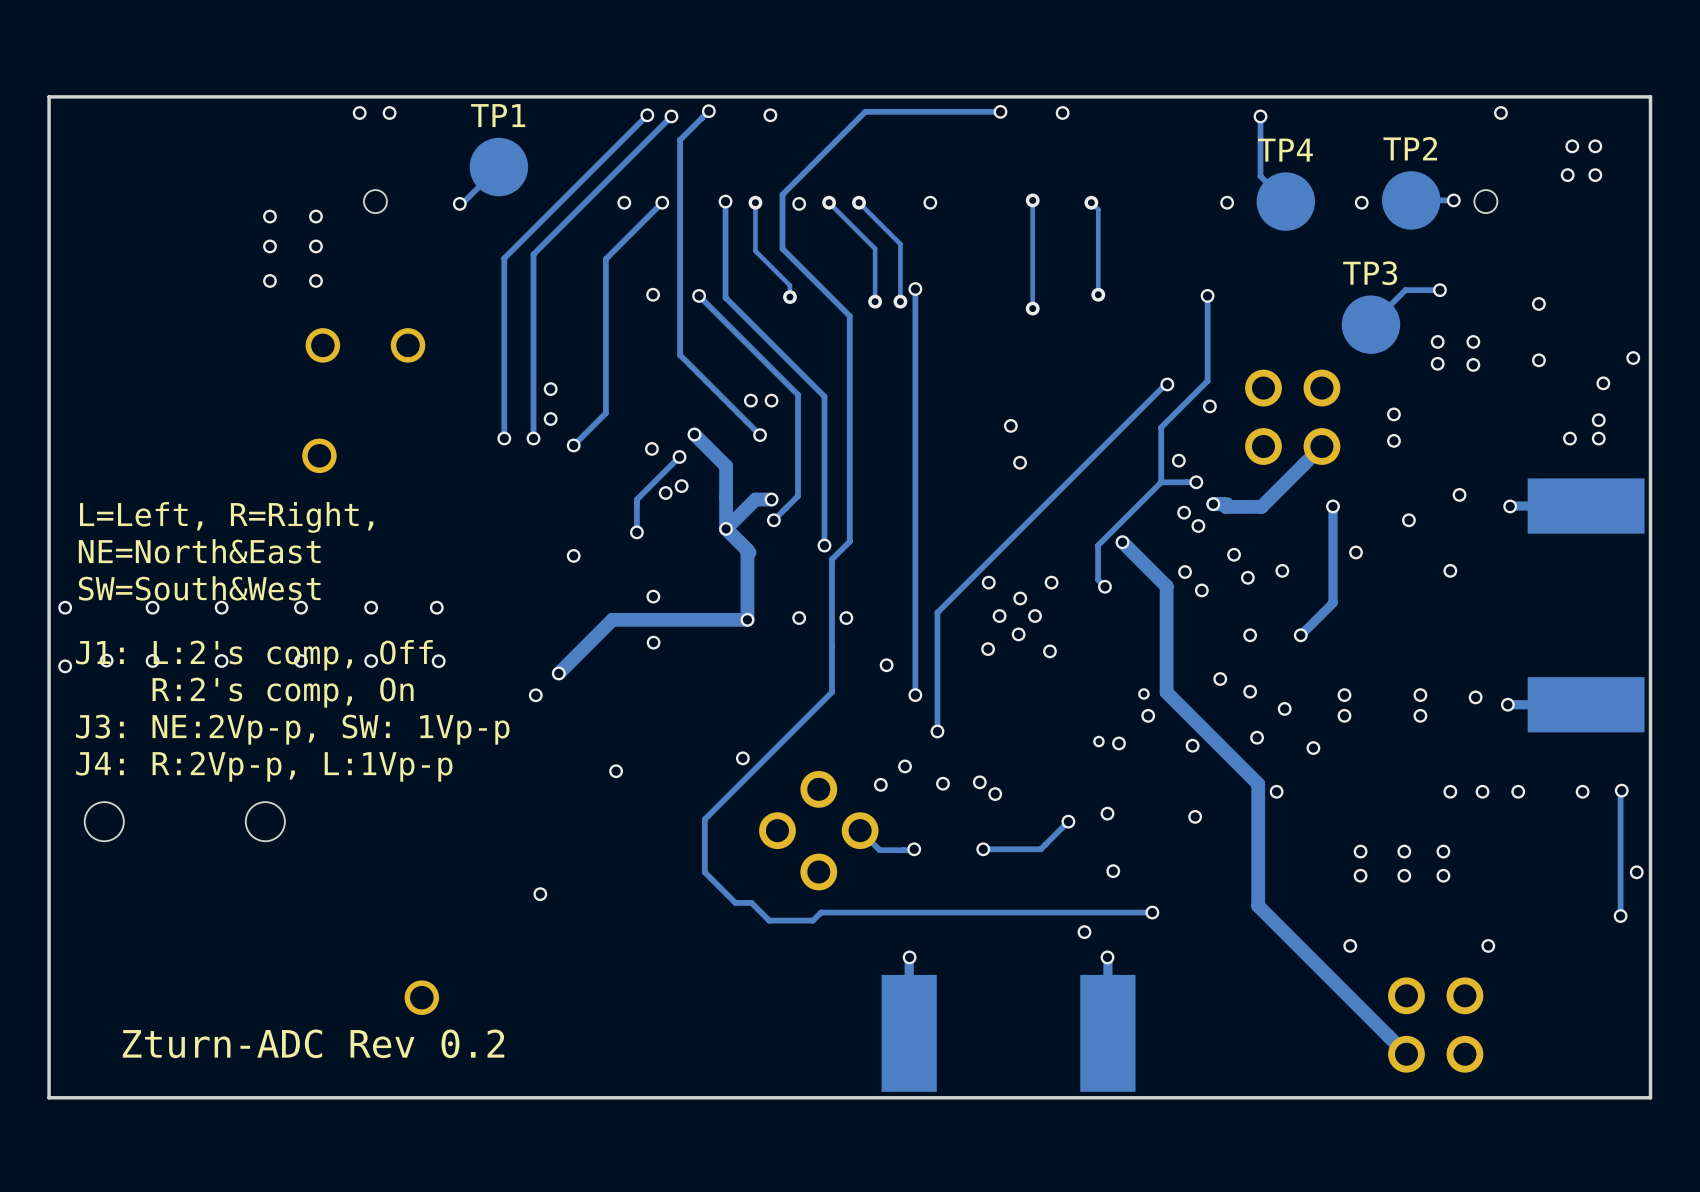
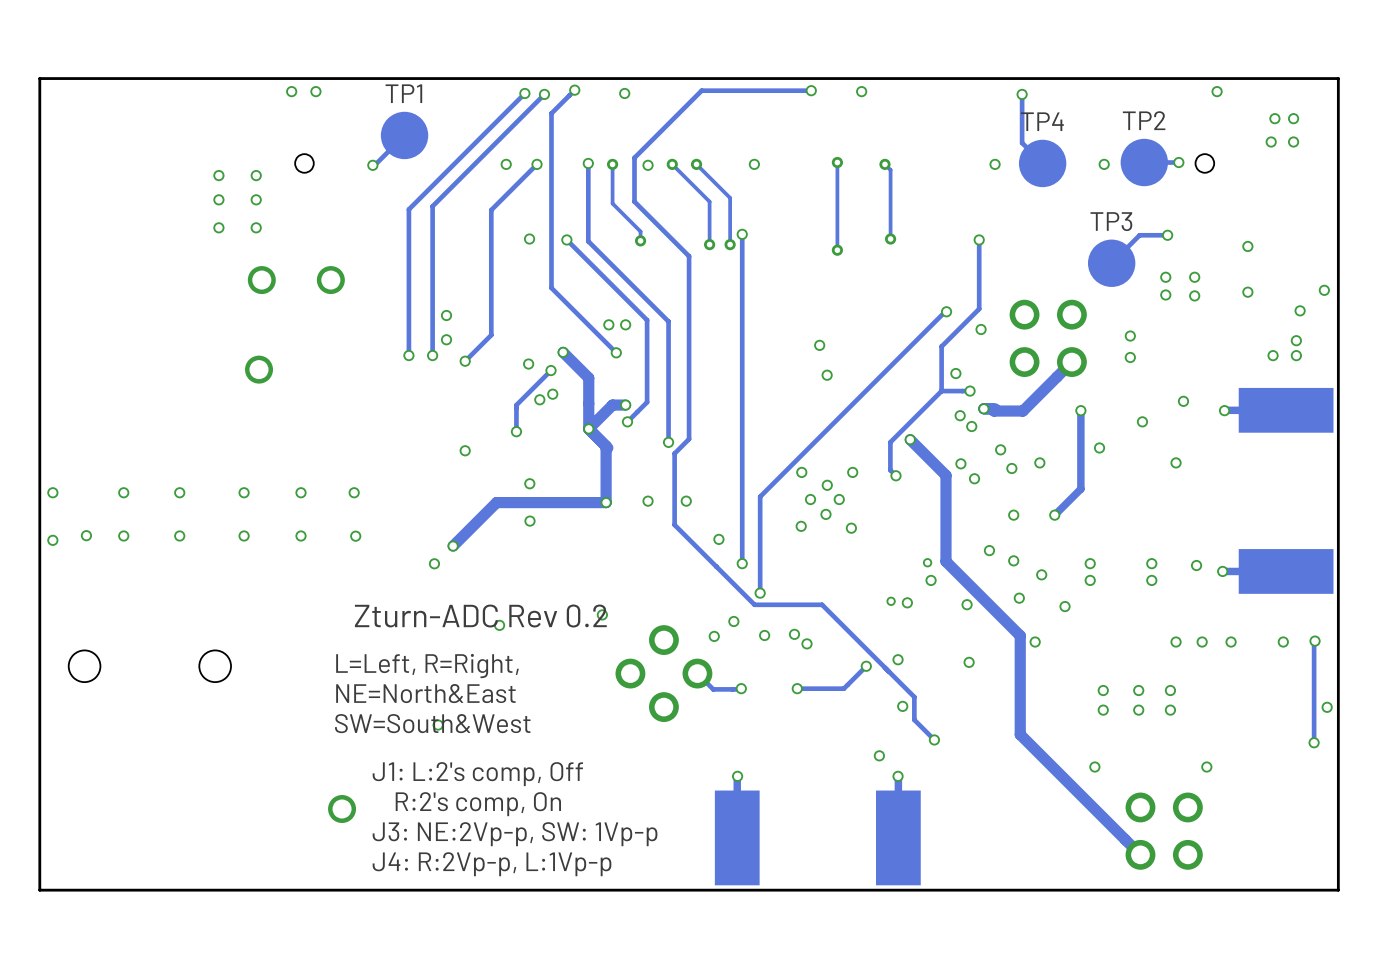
text position: L=Left, R=Right, (226, 517) -> L=Left, R=Right, (427, 666)
text position: NE=North&East (199, 551) -> NE=North&East (425, 693)
text position: SW=South&West (199, 588) -> SW=South&West (432, 723)
track: (831, 647) (831, 692) (704, 819) (704, 872) (735, 902) (751, 902) (769, 920) (812, 920) (821, 912) (1152, 912) -> (674, 524) (754, 604) (822, 604) (914, 697) (914, 719) (934, 739)
text position: J1: L:2's comp, Off (254, 655) -> J1: L:2's comp, Off (477, 774)
text position: R:2's comp, On (283, 692) -> R:2's comp, On (478, 804)
text position: J3: NE:2Vp-p, SW: 1Vp-p (292, 729) -> J3: NE:2Vp-p, SW: 1Vp-p (515, 834)
text position: J4: R:2Vp-p, L:1Vp-p (264, 766) -> J4: R:2Vp-p, L:1Vp-p (492, 864)
text position: Zturn-ADC Rev 0.2 (313, 1043) -> Zturn-ADC Rev 0.2 (480, 616)

